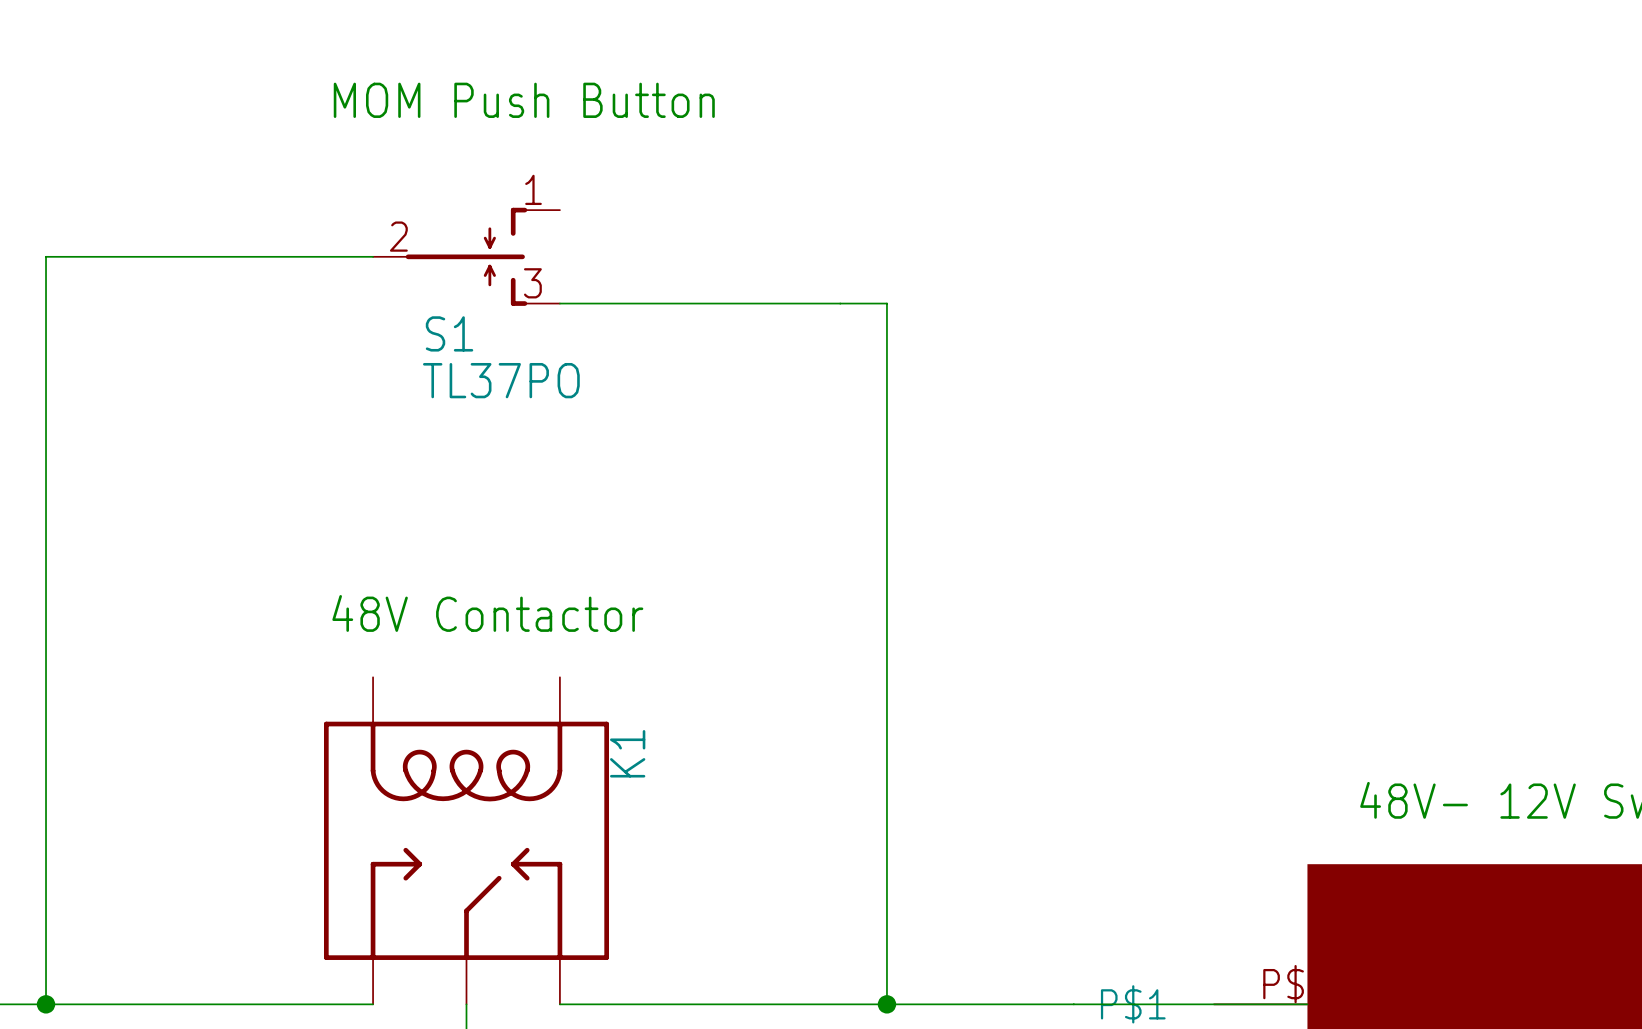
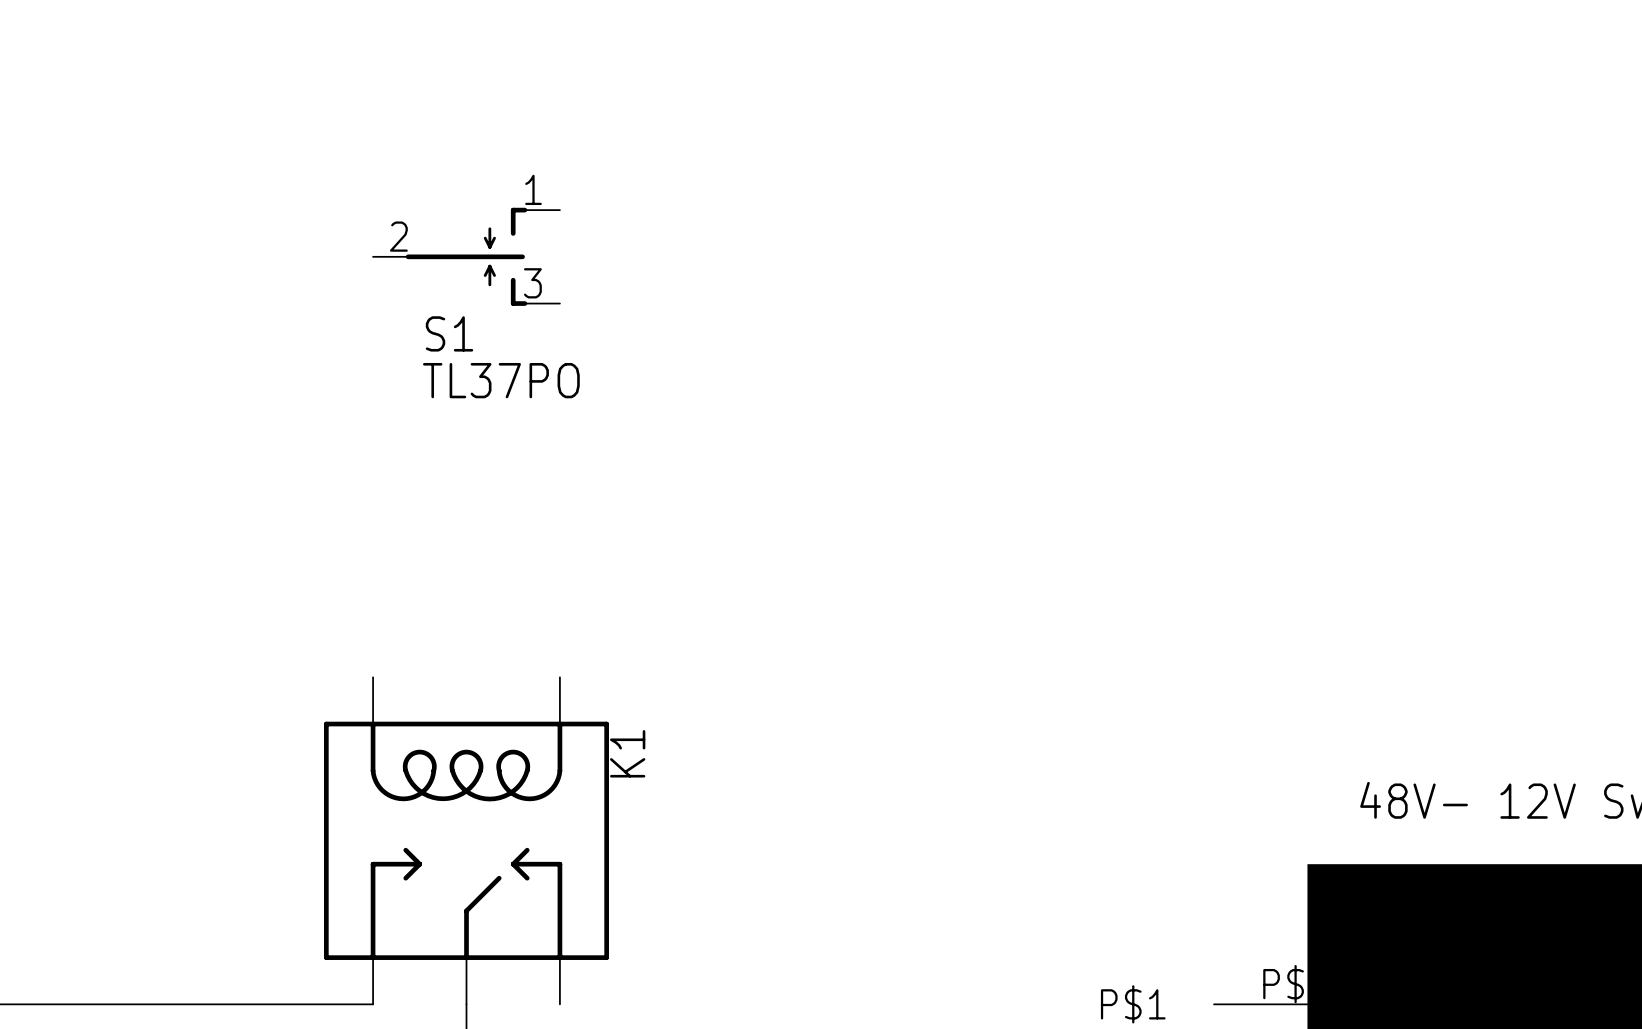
text: MOM Push Button (524, 100) -> none
wire: (373, 256) (46, 256) (46, 1004) -> none
wire: (559, 303) (886, 303) (886, 1004) -> none
text: 48V Contactor (487, 613) -> none
junction: (46, 1004) -> none
wire: (559, 1004) (1307, 1004) -> none
junction: (886, 1004) -> none

